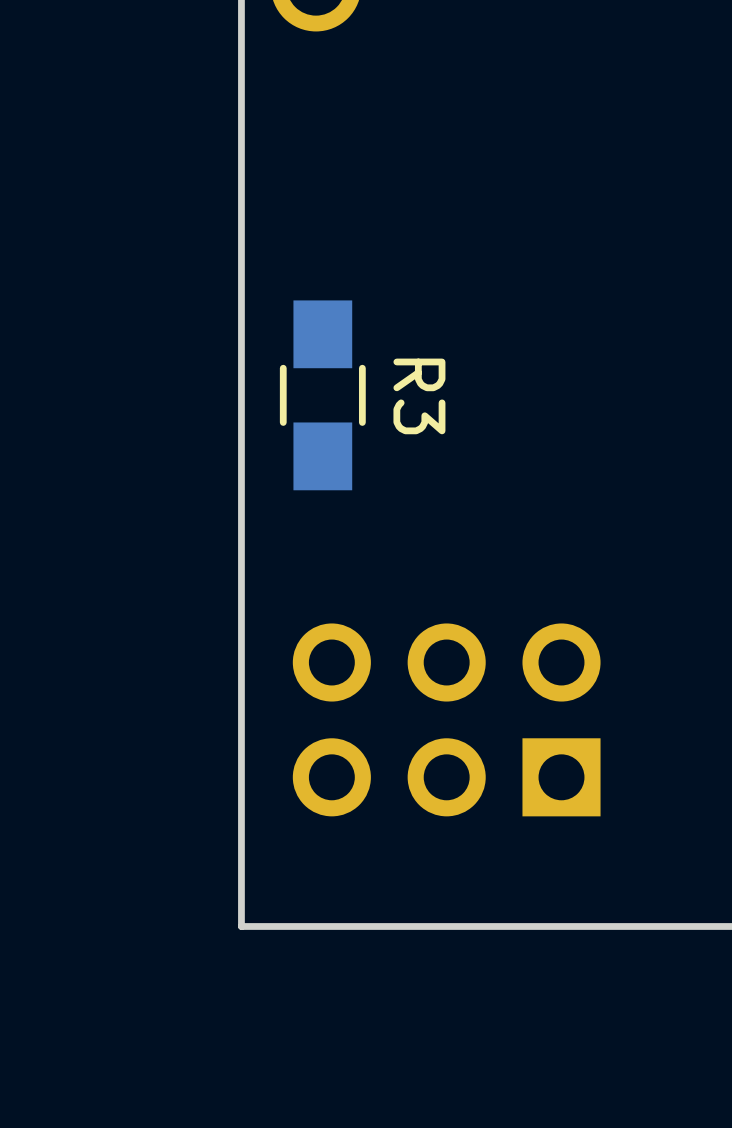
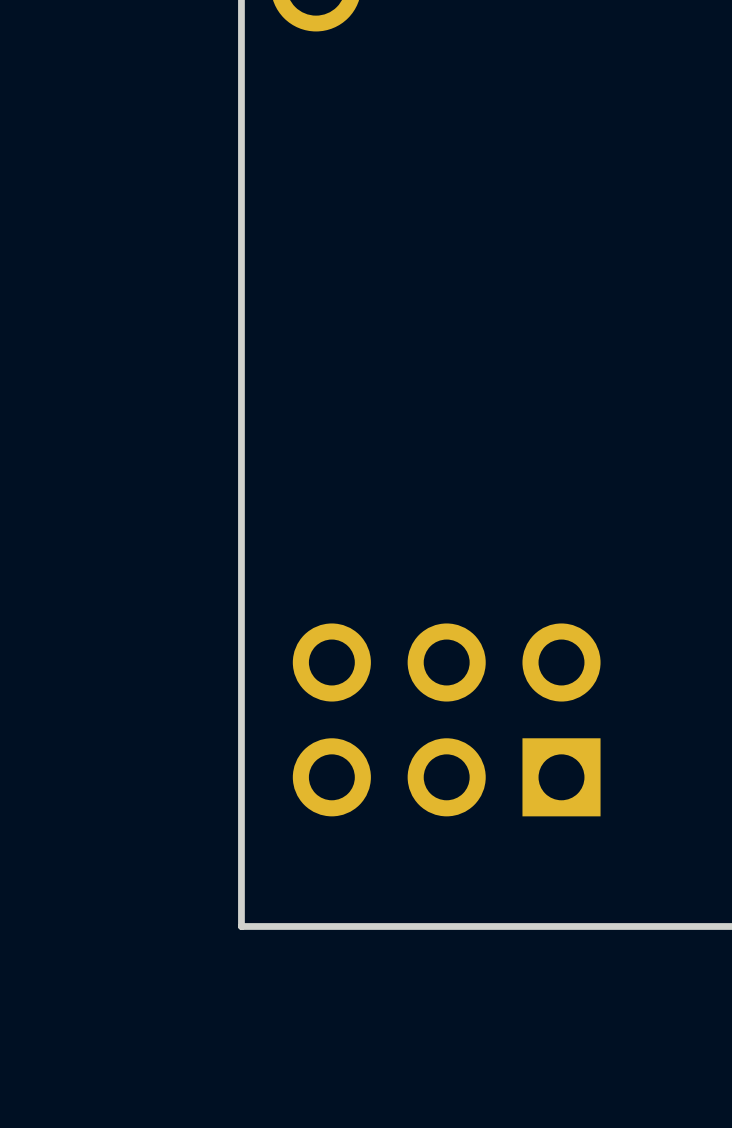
R3: (322, 395) -> none

